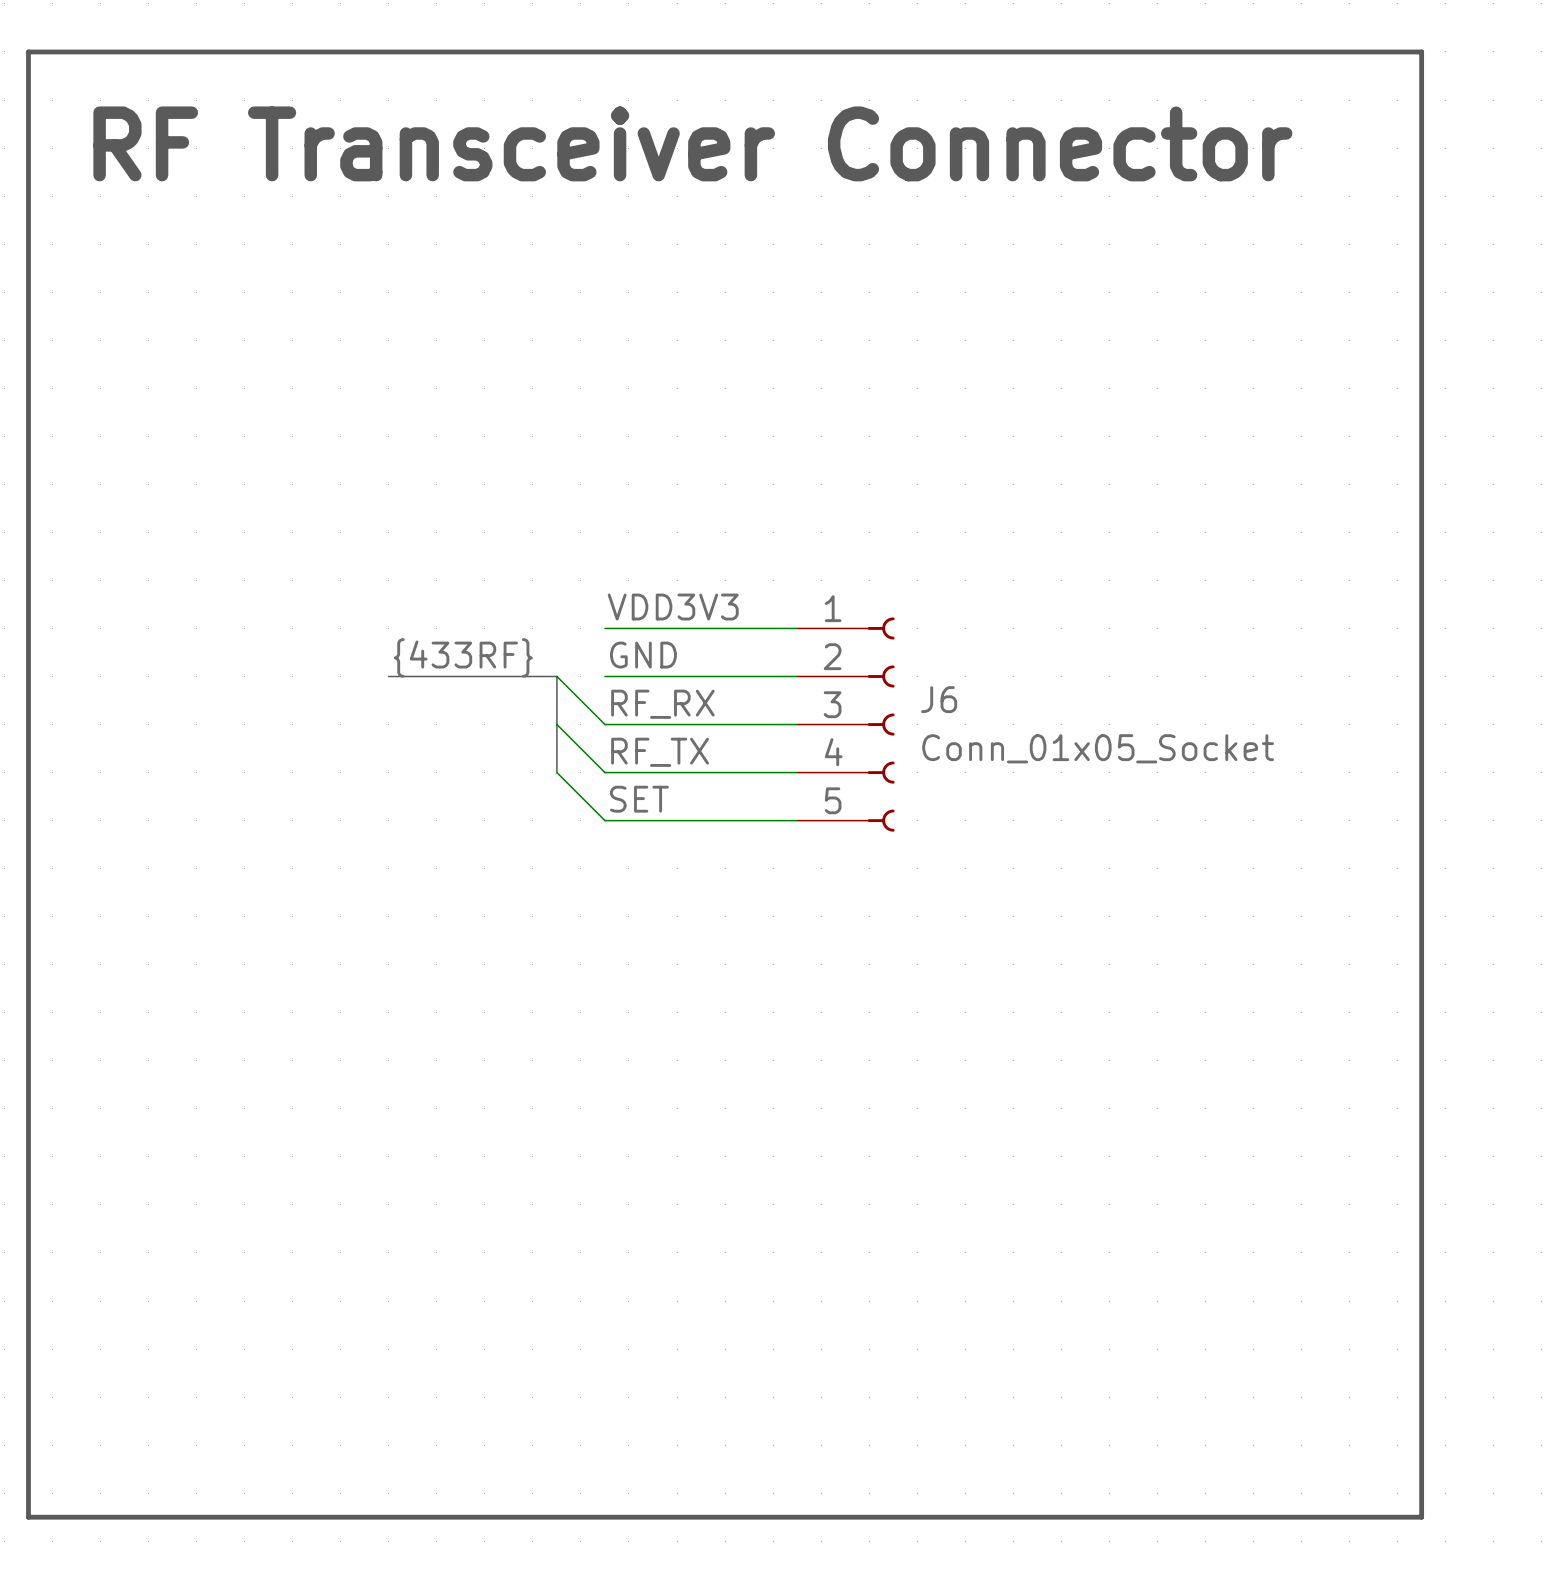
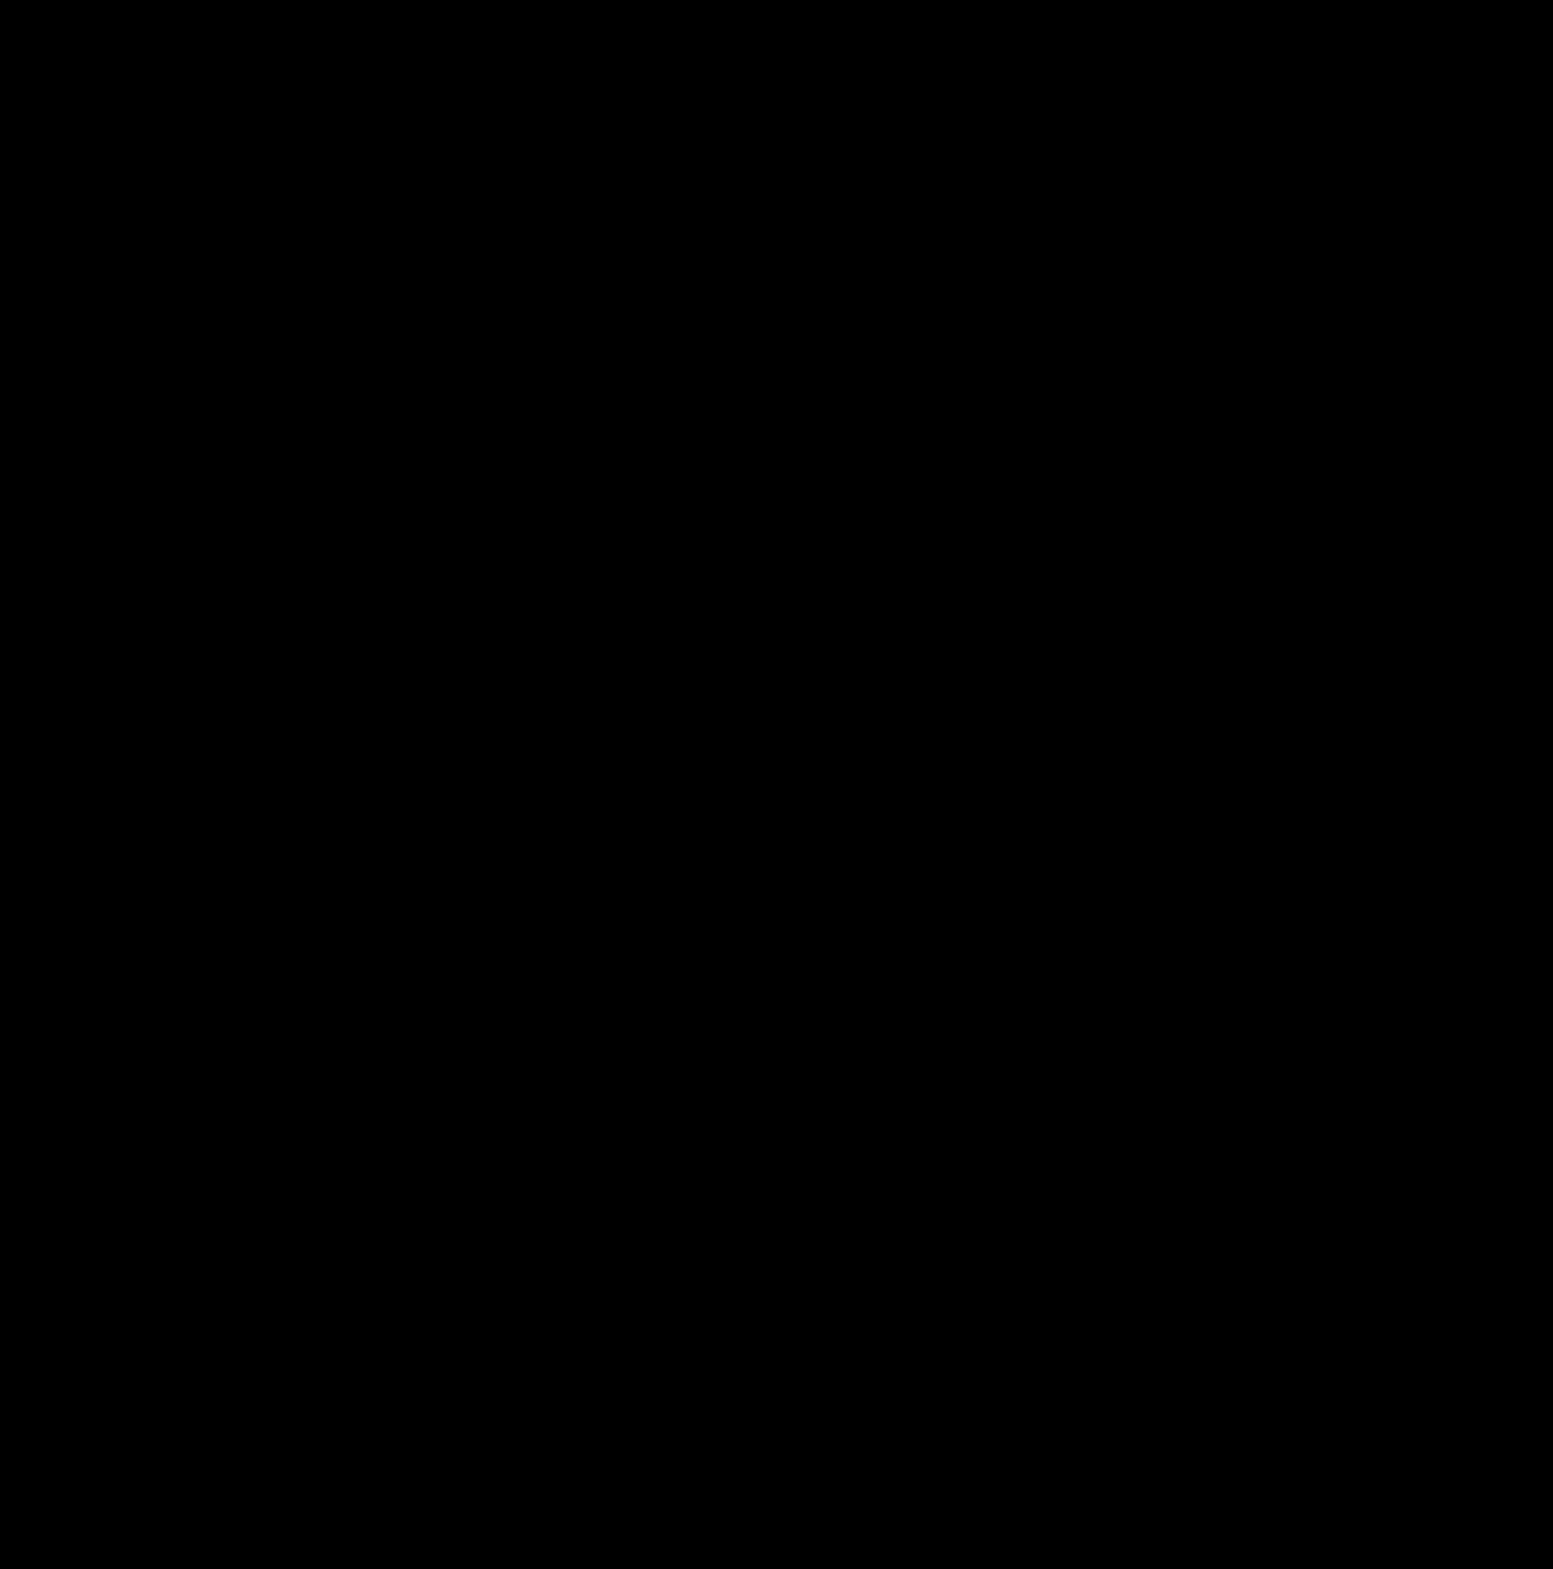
line: (28, 51) (1421, 51) (1421, 1517) (28, 1517) (28, 51) -> none
text: RF Transceiver Connector (692, 143) -> none
label: VDD3V3 (673, 607) -> none
wire: (604, 628) (797, 628) -> none
label: GND (643, 655) -> none
label: {433RF} (463, 657) -> none
bus: (388, 676) (556, 676) (556, 772) -> none
wire: (556, 676) (604, 724) (797, 724) -> none
wire: (604, 676) (797, 676) -> none
label: RF_RX (662, 704) -> none
wire: (556, 724) (604, 772) (797, 772) -> none
J6: Conn_01x05_Socket (845, 724) -> none
label: RF_TX (660, 752) -> none
wire: (556, 772) (604, 820) (797, 820) -> none
label: SET (639, 799) -> none

